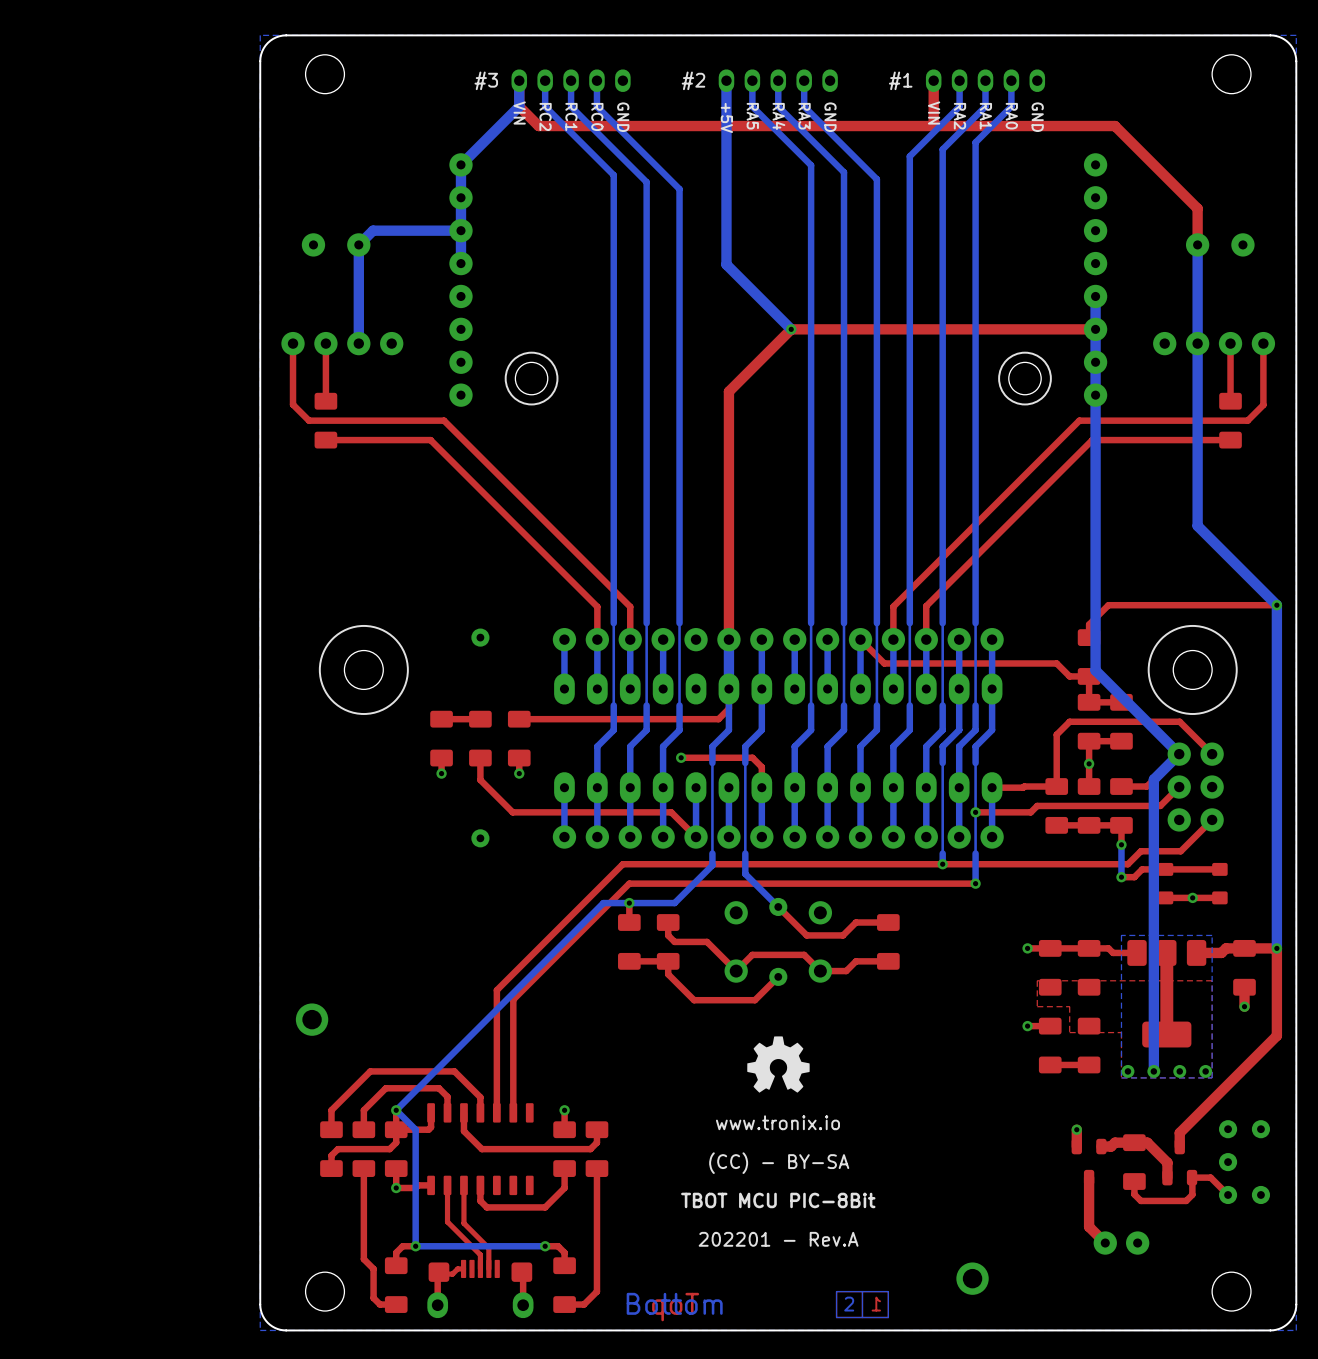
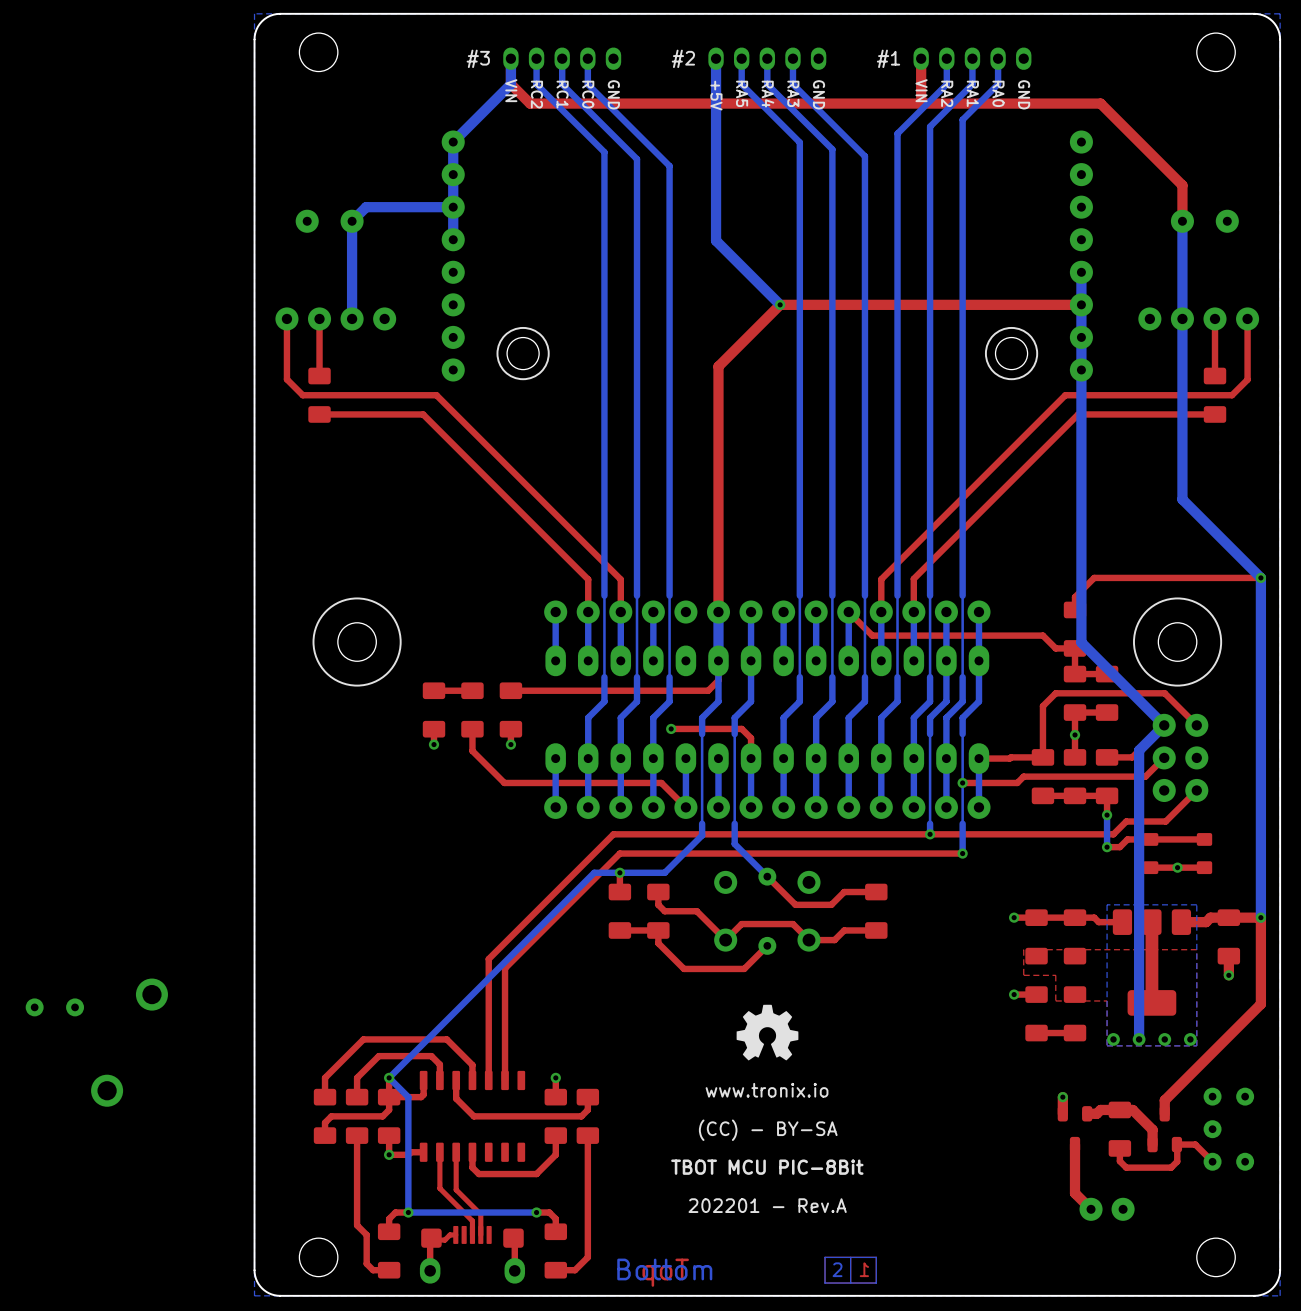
part: (480, 637) -> none
part: (480, 838) -> none
part: (312, 1019) -> none
part: none -> (151, 994)
part: none -> (34, 1007)
part: none -> (75, 1007)
part: none -> (107, 1090)
part: (972, 1278) -> none

